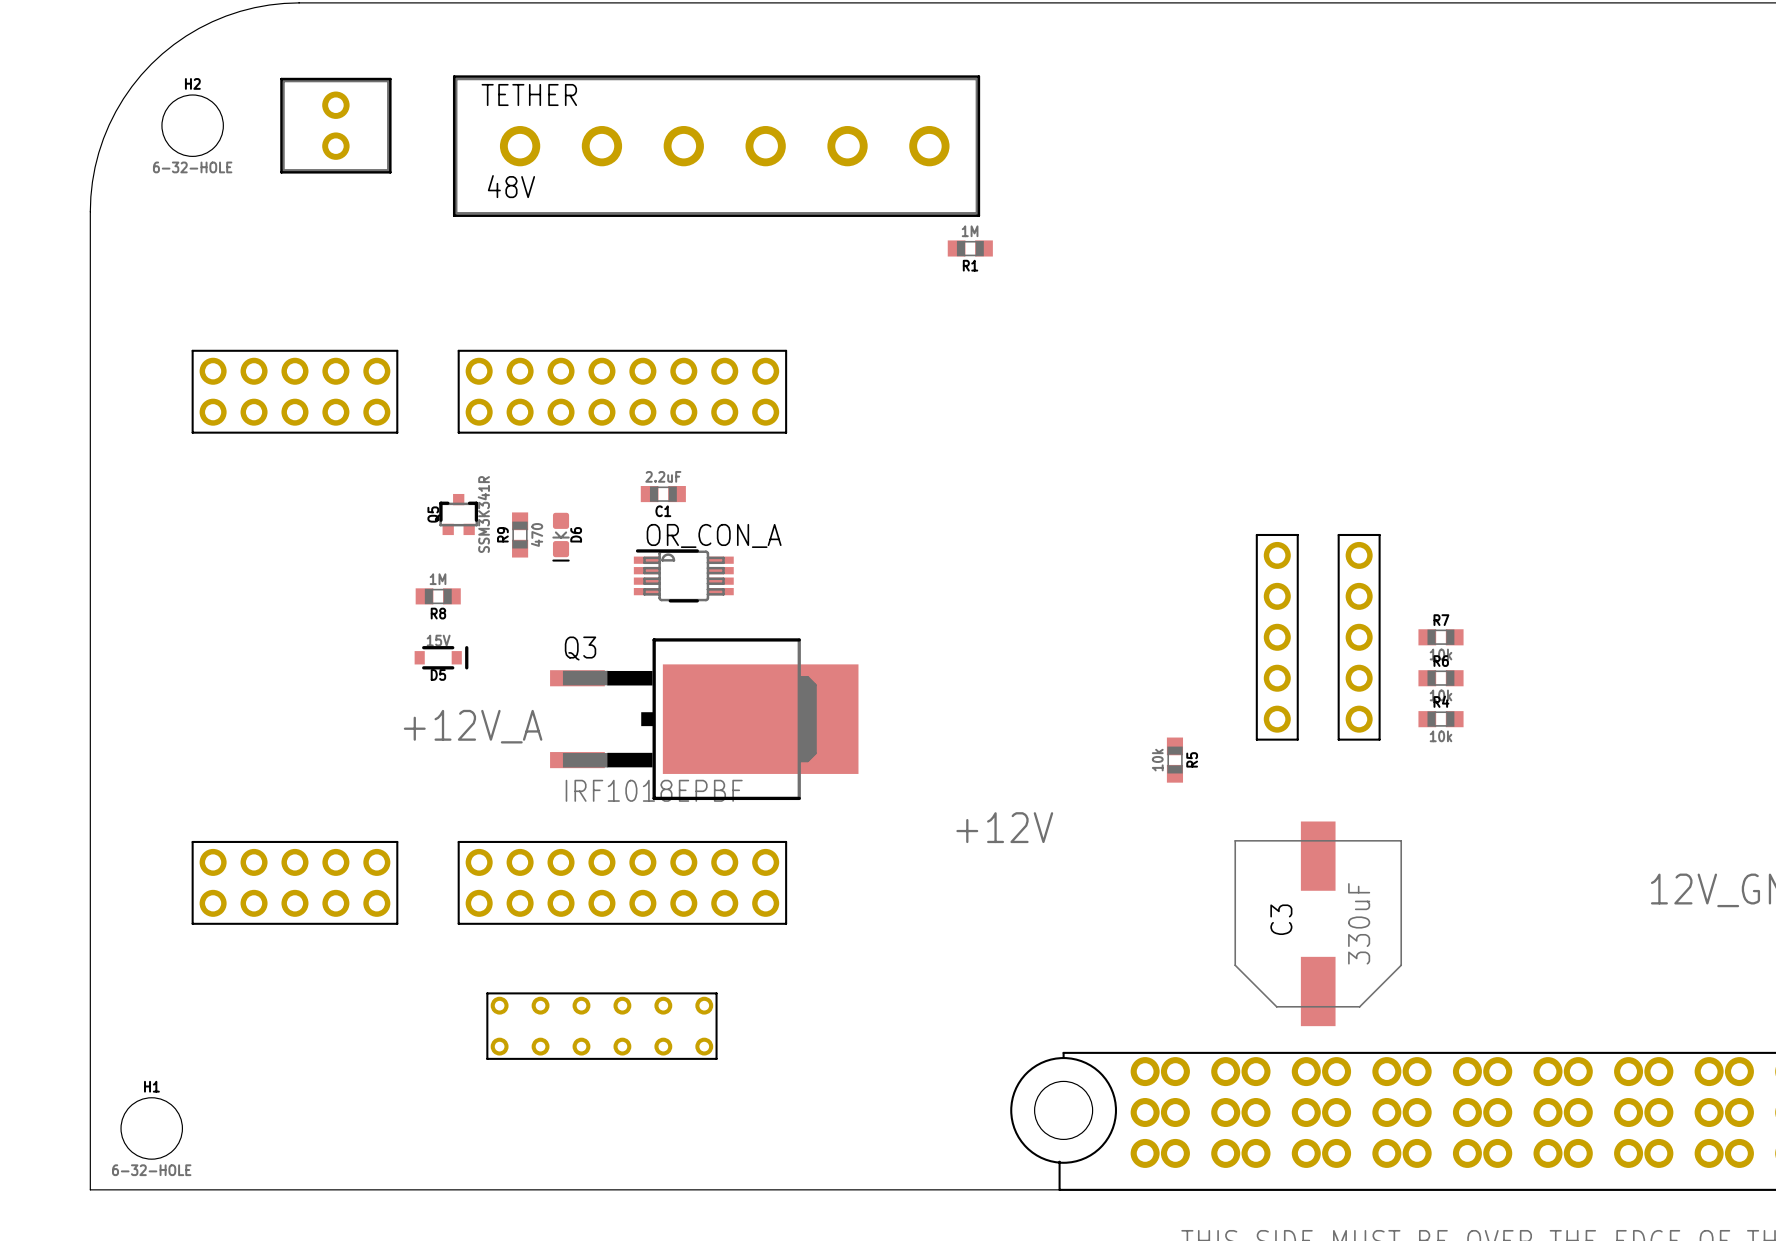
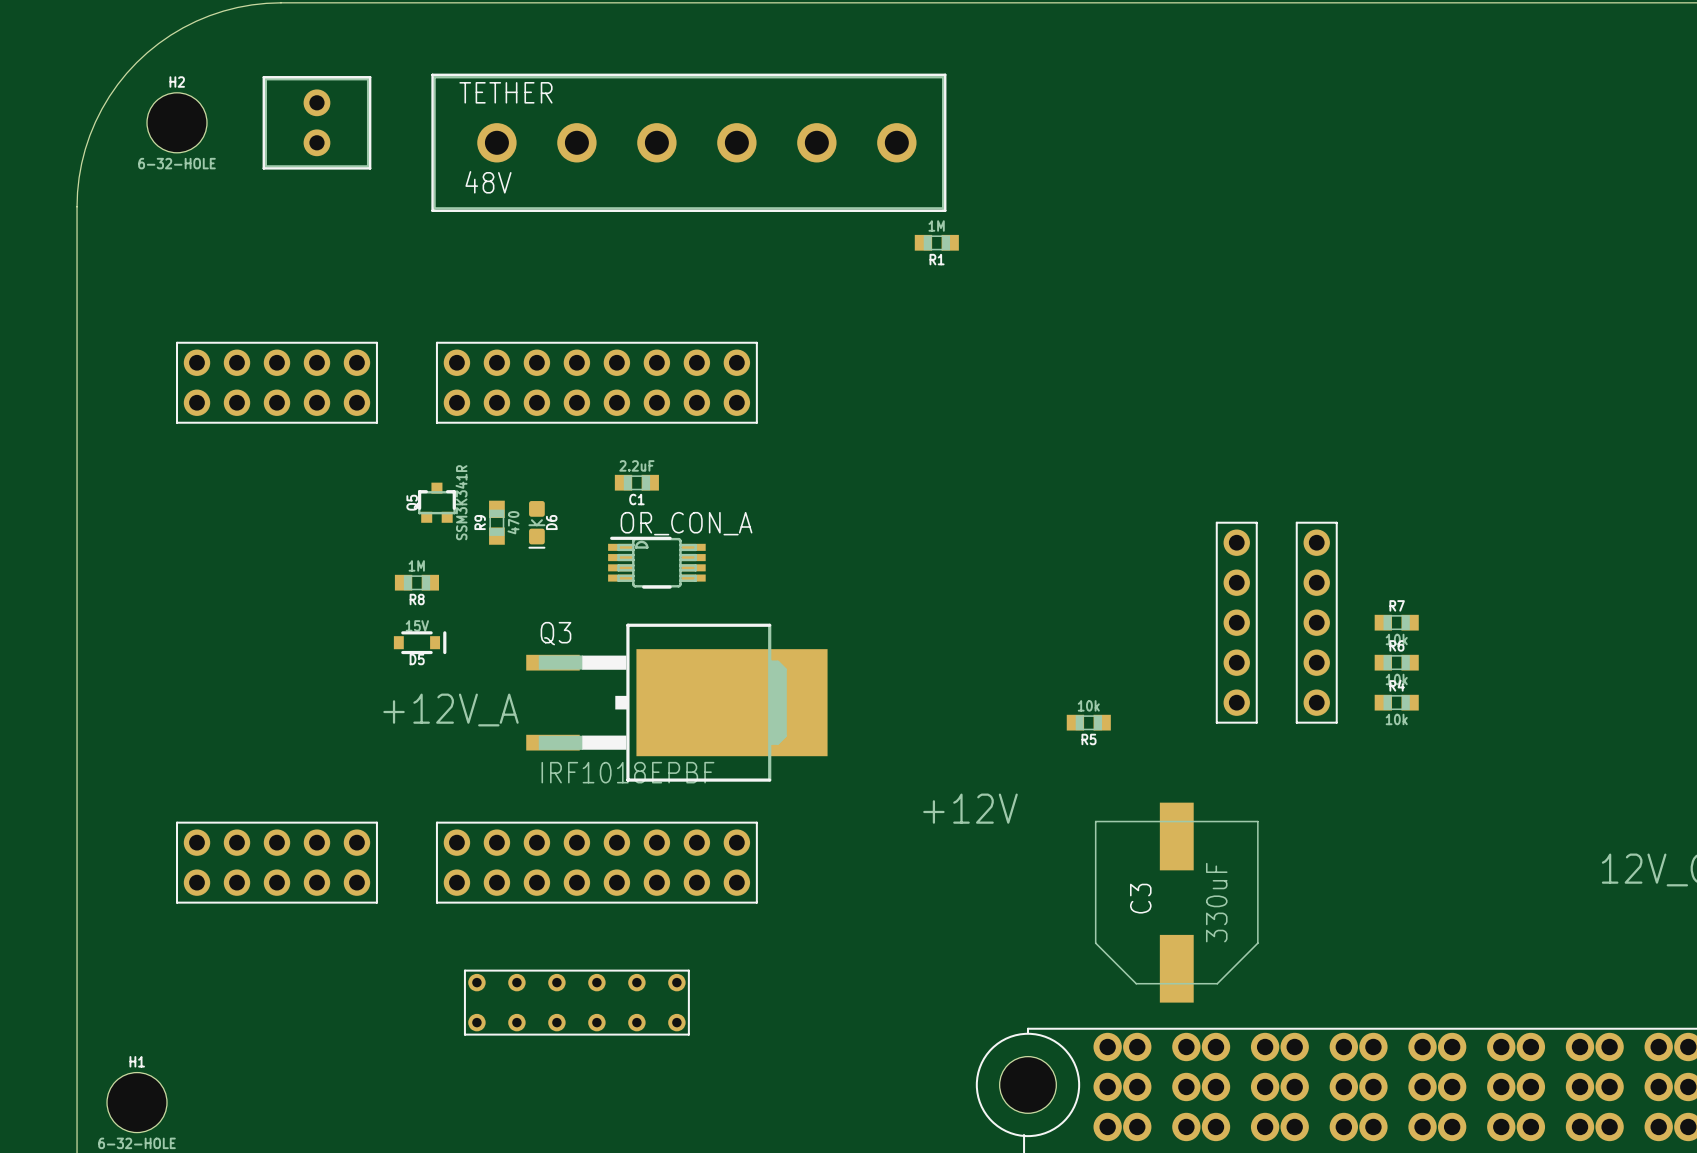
R5 rotation: 0° (1174, 760) -> 90° clockwise (1088, 722)
R5 position: (1174, 760) -> (1088, 722)
C3 position: (1318, 923) -> (1176, 902)

